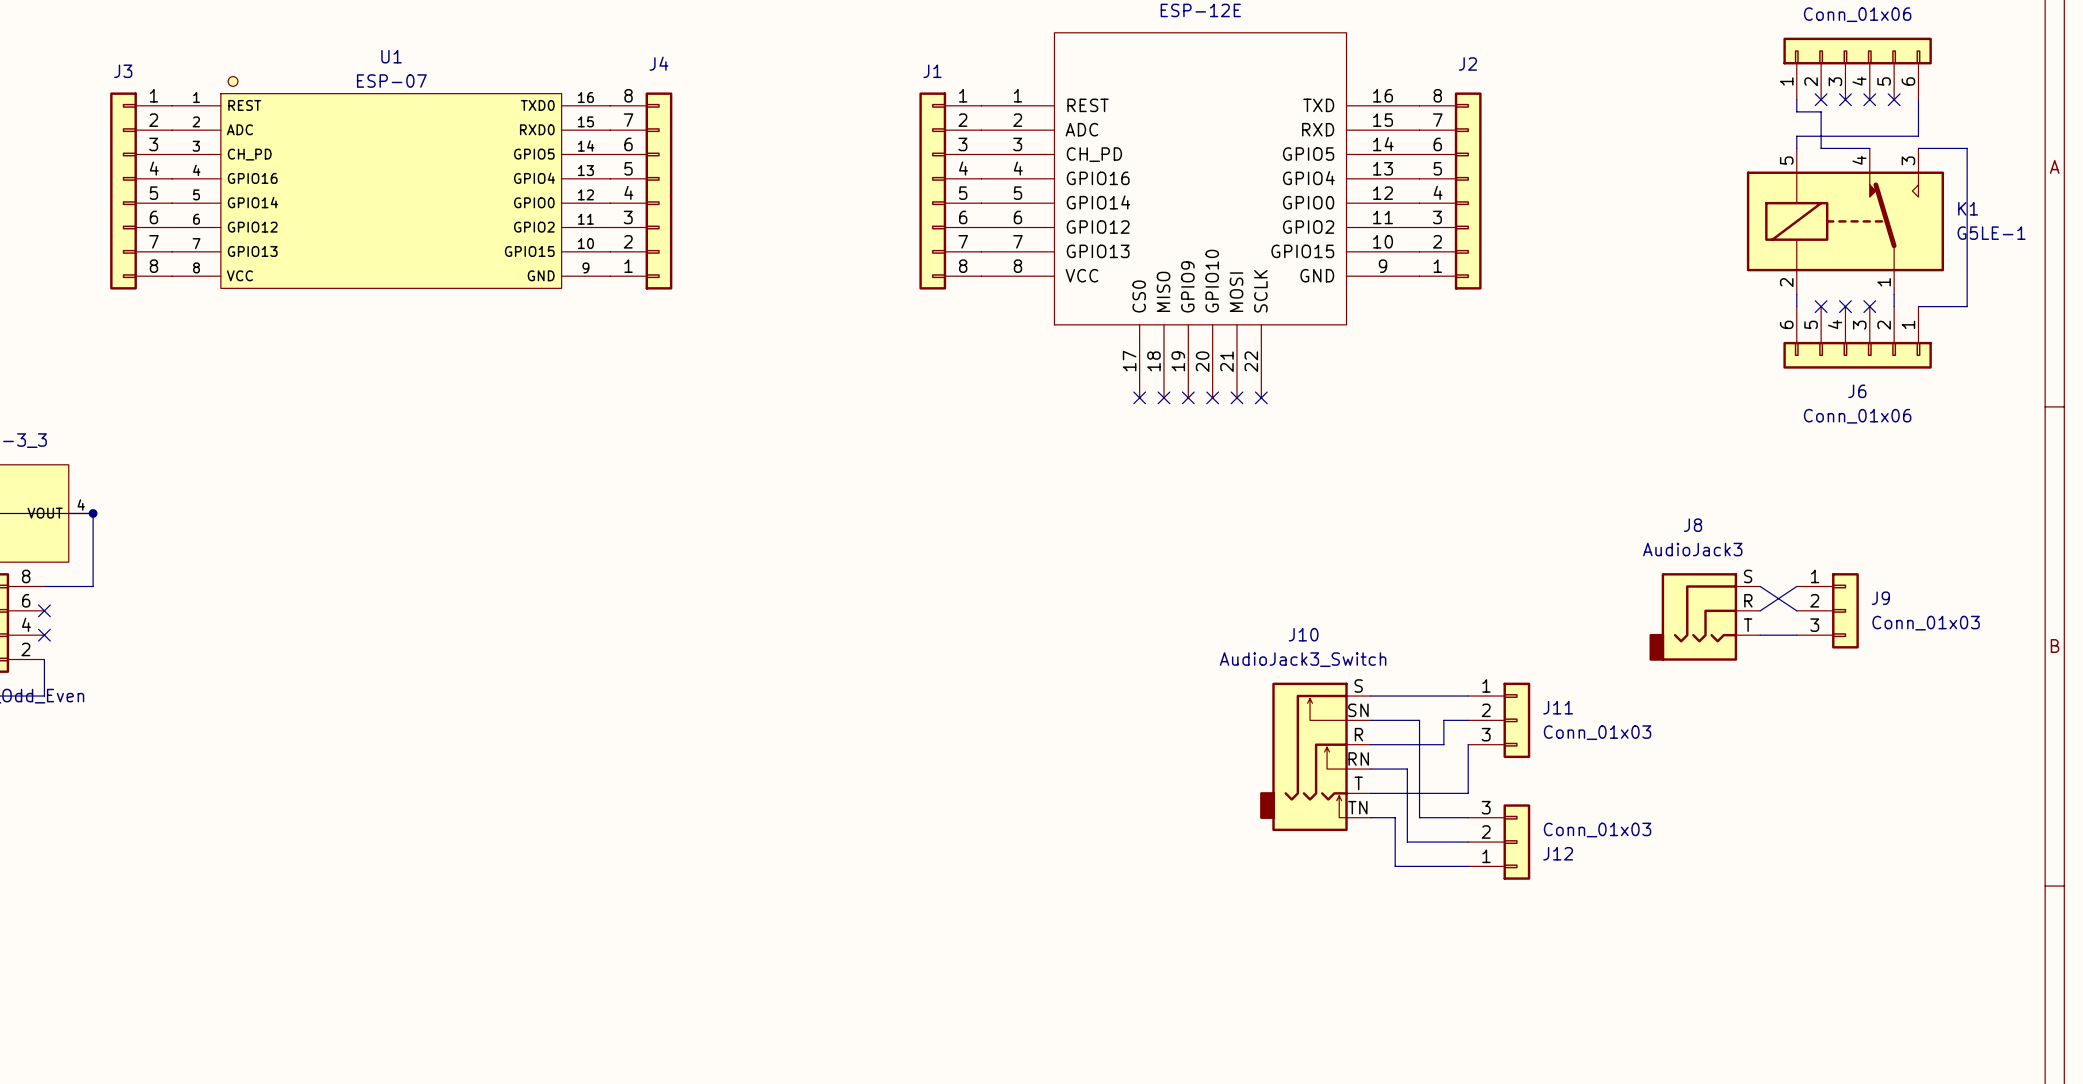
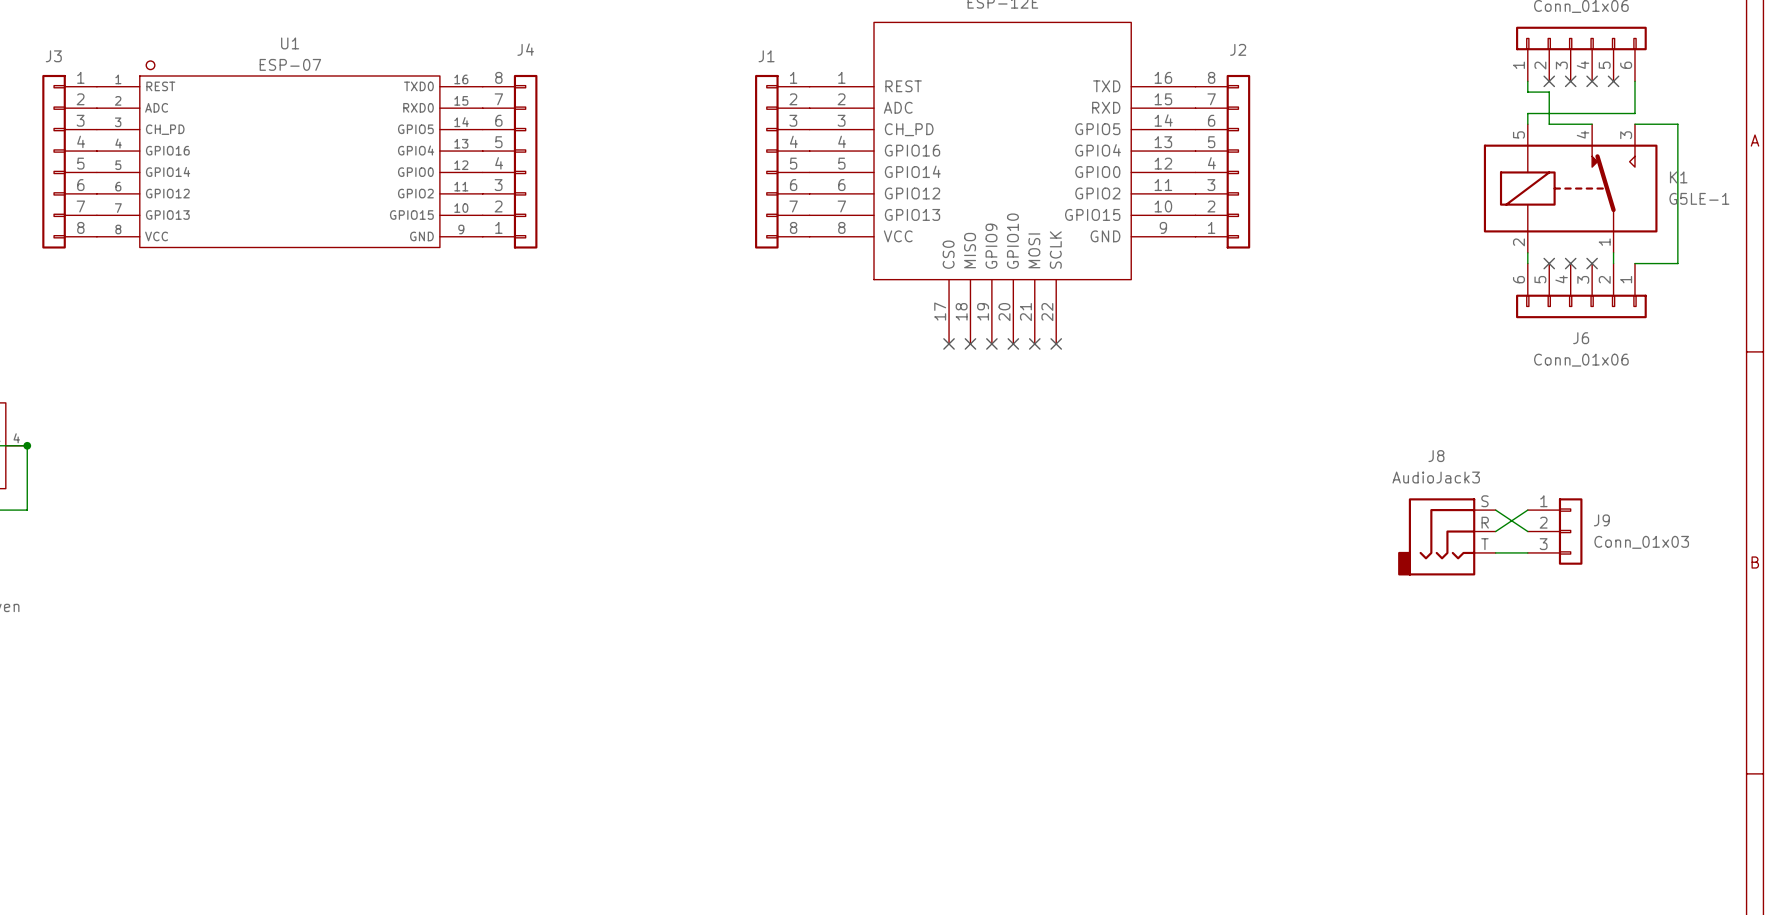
wire: (1370, 696) (1468, 696) -> none
wire: (1370, 720) (1419, 720) (1419, 817) (1468, 817) -> none
wire: (1468, 720) (1443, 720) (1443, 744) (1370, 744) -> none
J11: Conn_01x03 (1499, 720) -> none
wire: (1468, 744) (1468, 793) (1370, 793) -> none
J10: AudioJack3_Switch (1315, 756) -> none
wire: (1370, 769) (1407, 769) (1407, 842) (1468, 842) -> none
wire: (1370, 817) (1395, 817) (1395, 866) (1468, 866) -> none
J12: Conn_01x03 (1499, 842) -> none

